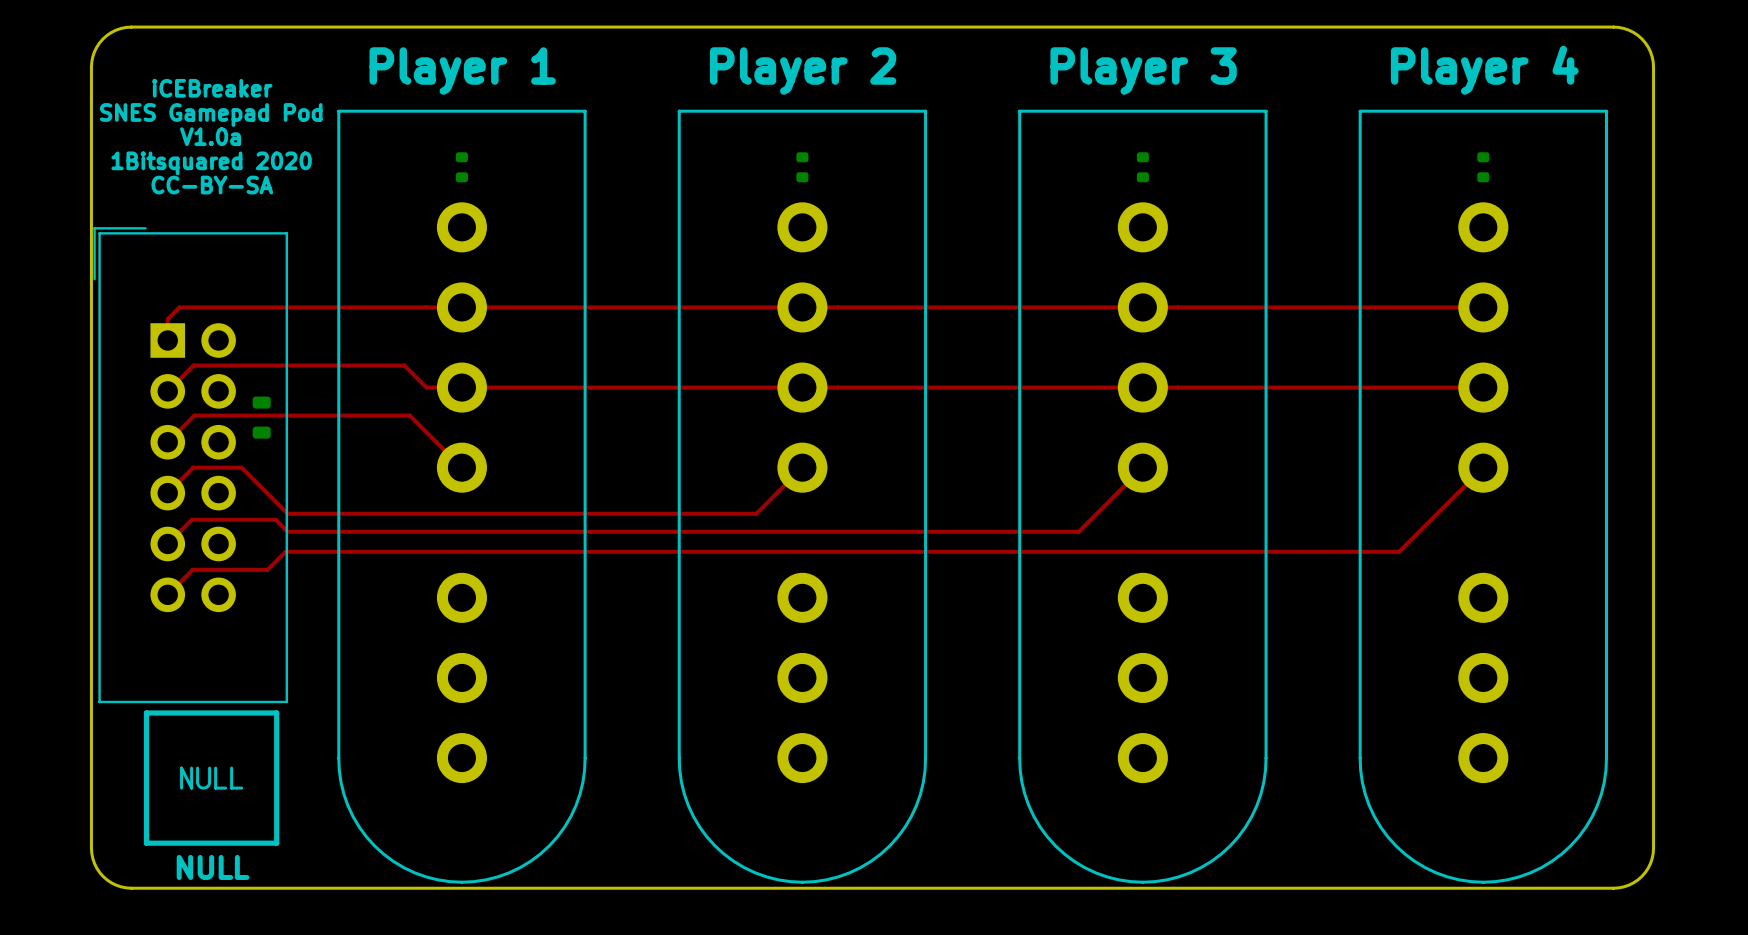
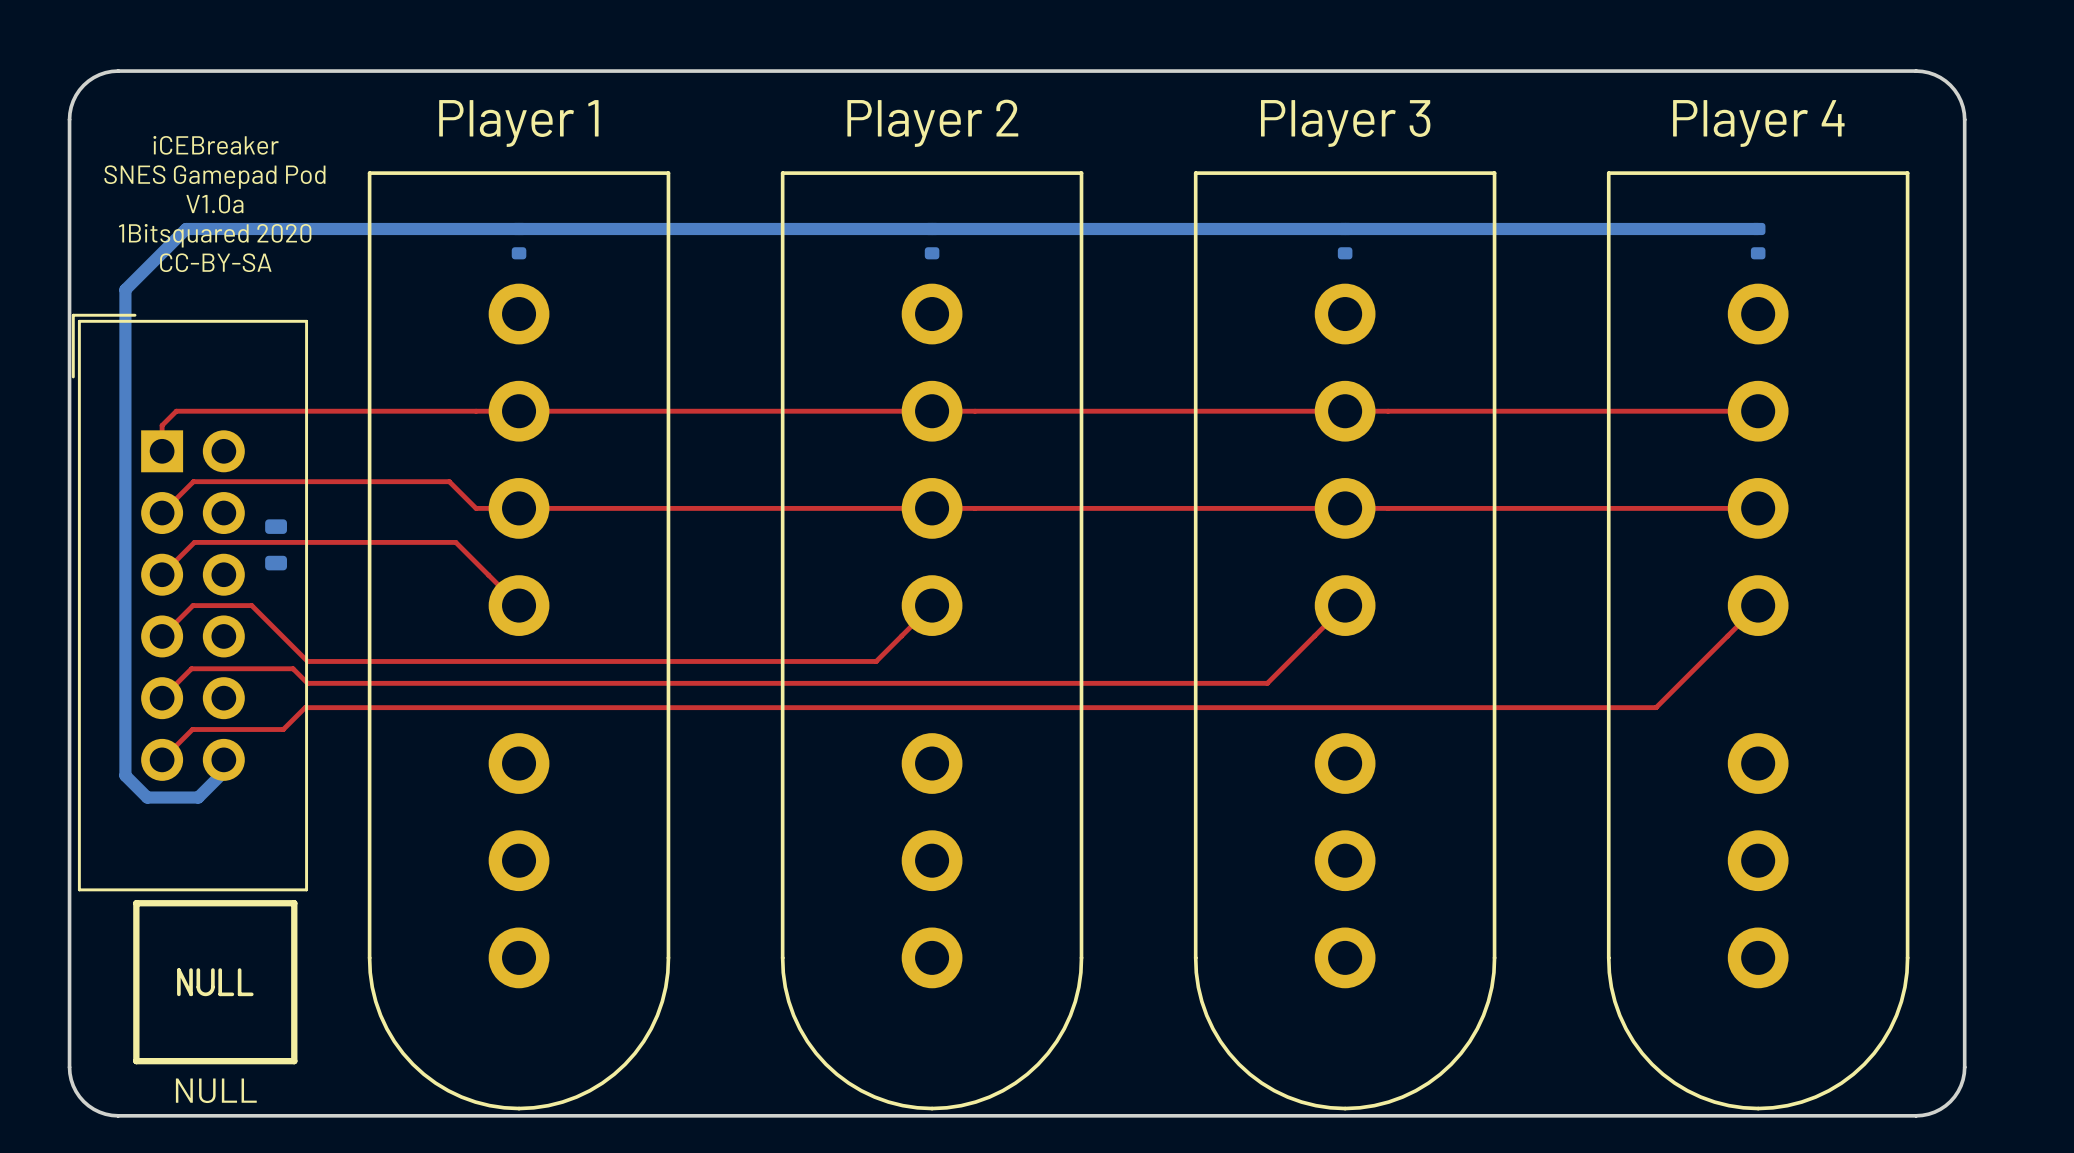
bottom track: none -> (1758, 228) (186, 228) (125, 289) (125, 775) (147, 797) (198, 797) (223, 772) (223, 759) (223, 762)

